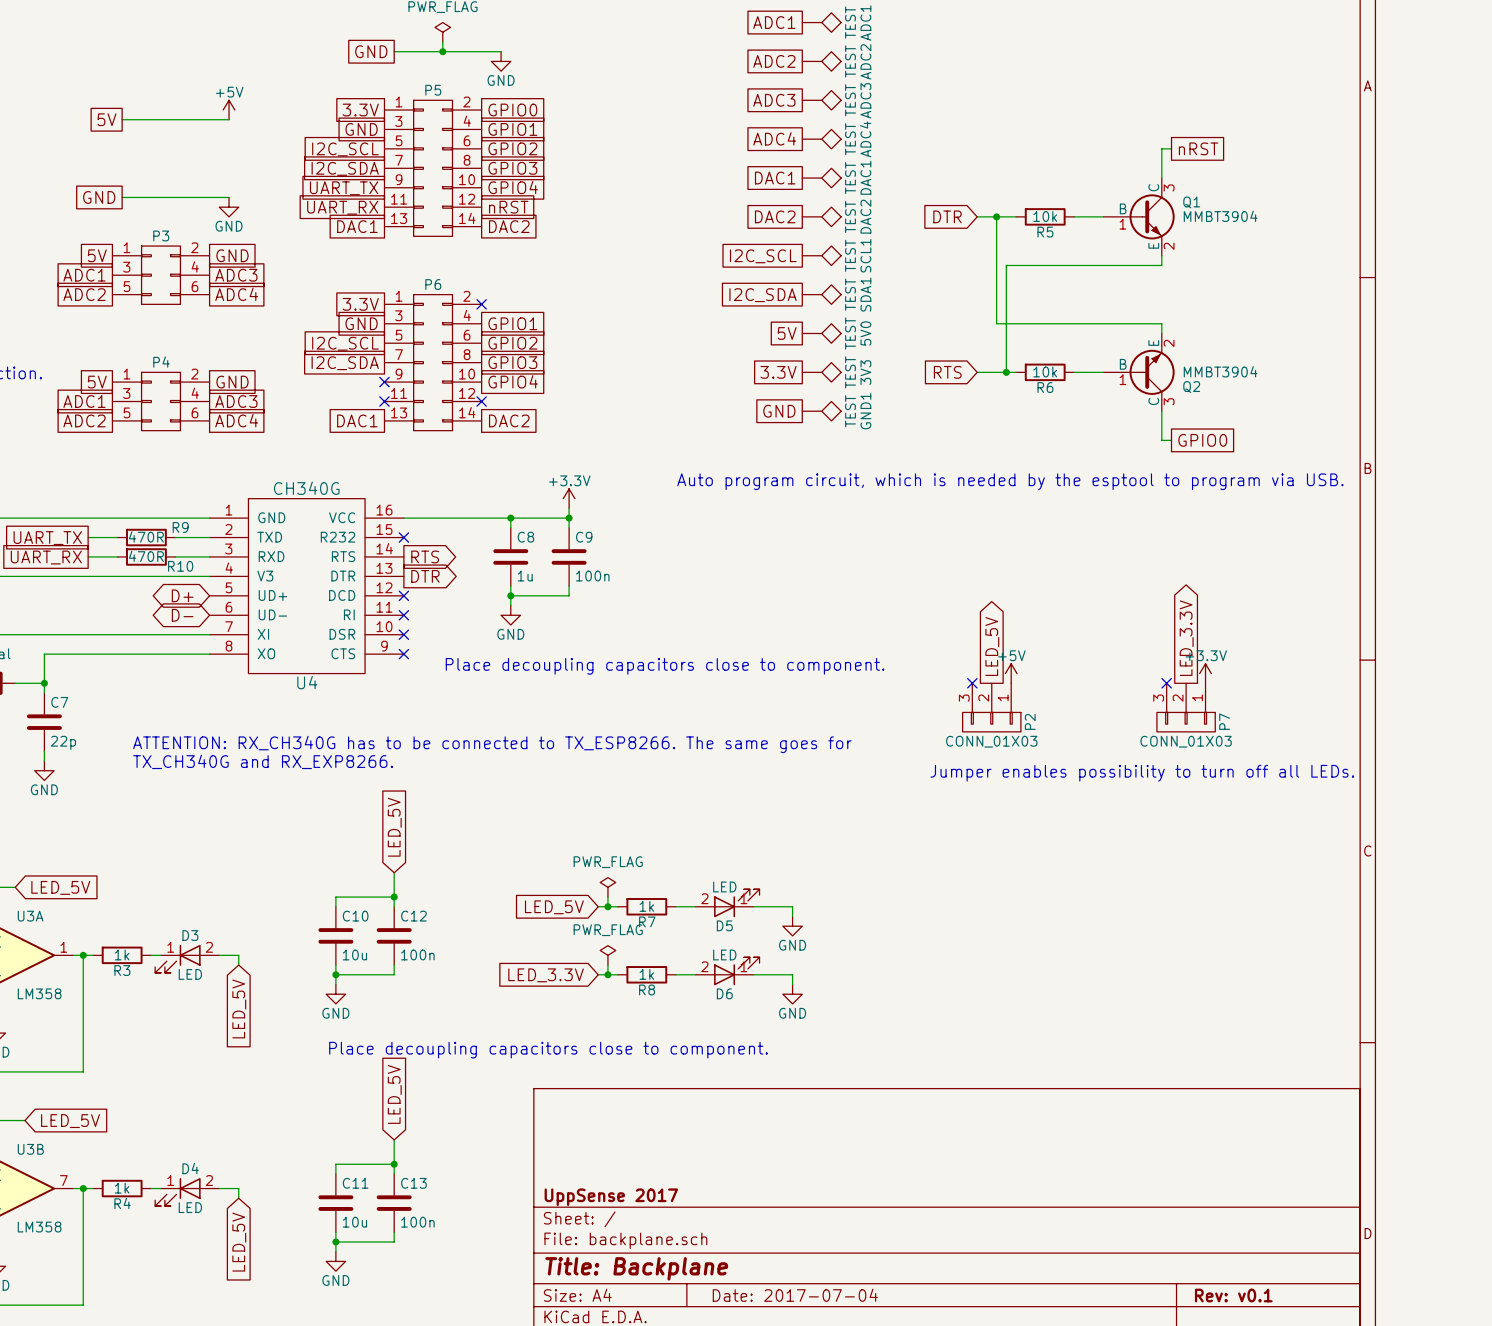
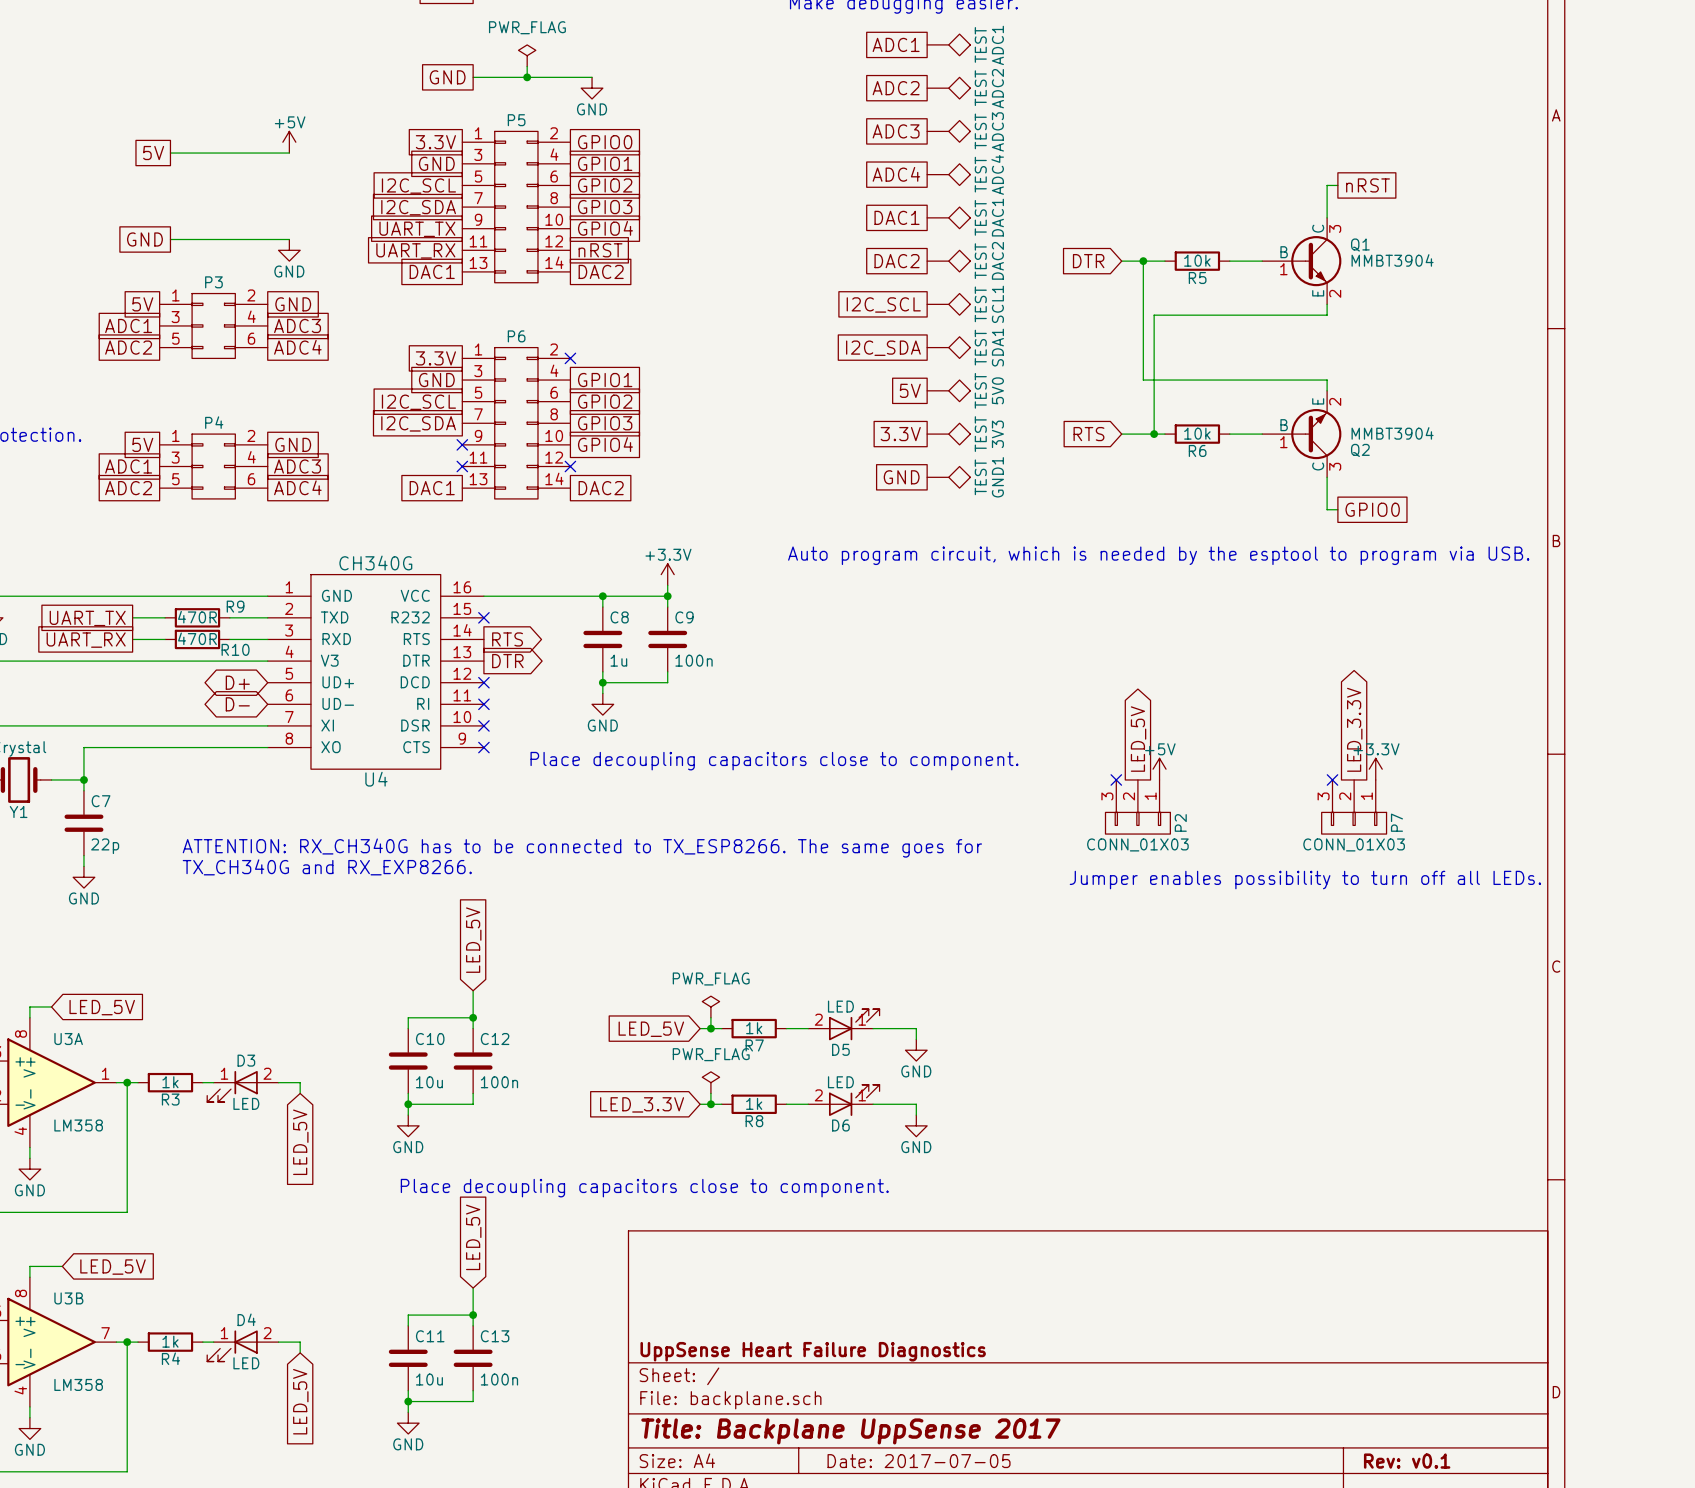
title block: UppSense 2017 (611, 1197) -> UppSense Heart Failure Diagnostics (813, 1351)
title block: Title: Backplane (636, 1268) -> Title: Backplane UppSense 2017 (850, 1431)
title block: Date: 2017-07-04 (795, 1295) -> Date: 2017-07-05 (919, 1461)

